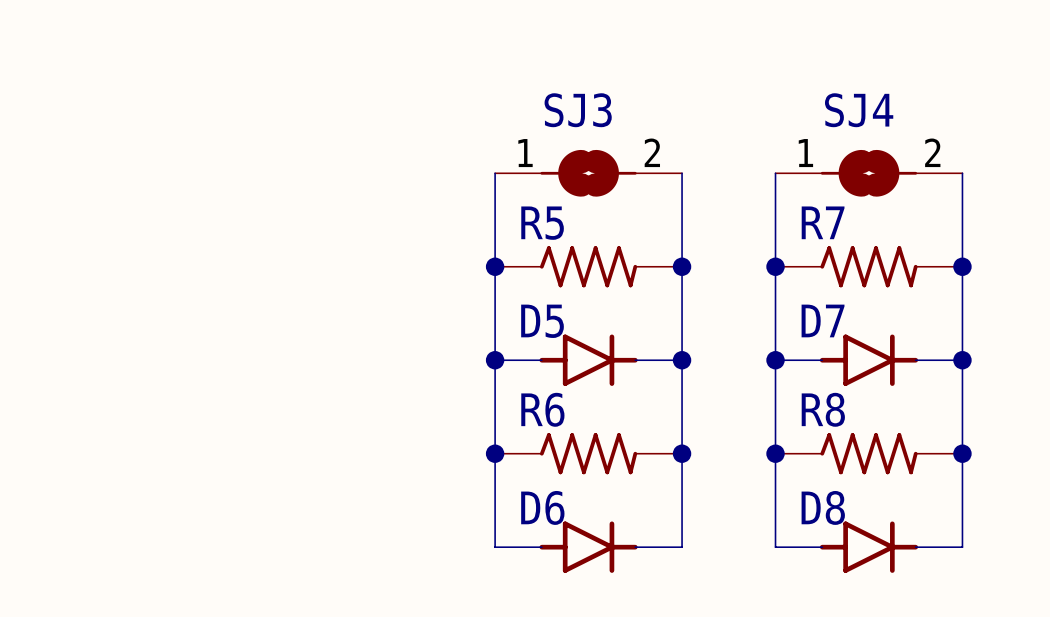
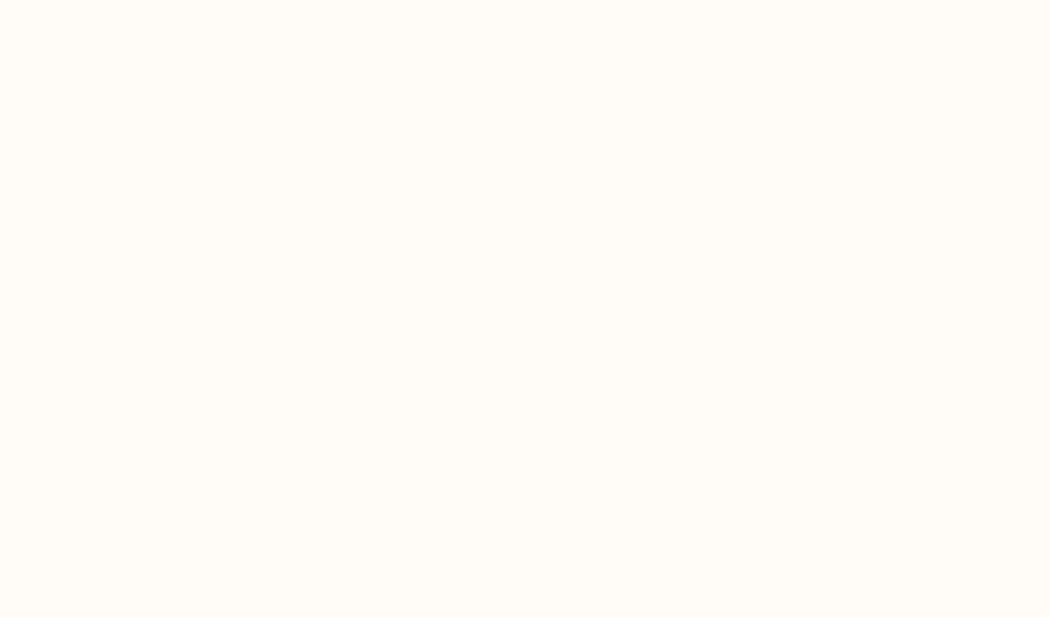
wire: (495, 173) (495, 547) (541, 547) -> none
SJ3: (588, 173) -> none
wire: (682, 173) (682, 547) (635, 547) -> none
wire: (775, 173) (775, 547) (822, 547) -> none
SJ4: (868, 173) -> none
wire: (962, 173) (962, 547) (915, 547) -> none
junction: (495, 266) -> none
R5: (588, 266) -> none
junction: (682, 266) -> none
junction: (775, 266) -> none
R7: (868, 266) -> none
junction: (962, 266) -> none
wire: (495, 360) (541, 360) -> none
junction: (495, 360) -> none
D5: (588, 360) -> none
wire: (635, 360) (682, 360) -> none
junction: (682, 360) -> none
wire: (775, 360) (822, 360) -> none
junction: (775, 360) -> none
D7: (868, 360) -> none
wire: (915, 360) (962, 360) -> none
junction: (962, 360) -> none
junction: (495, 453) -> none
R6: (588, 453) -> none
junction: (682, 453) -> none
junction: (775, 453) -> none
R8: (868, 453) -> none
junction: (962, 453) -> none
D6: (588, 547) -> none
D8: (868, 547) -> none

